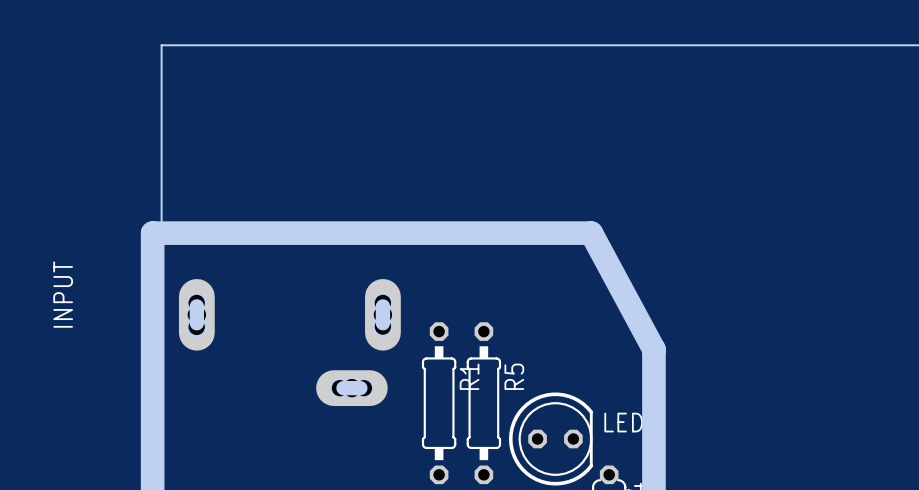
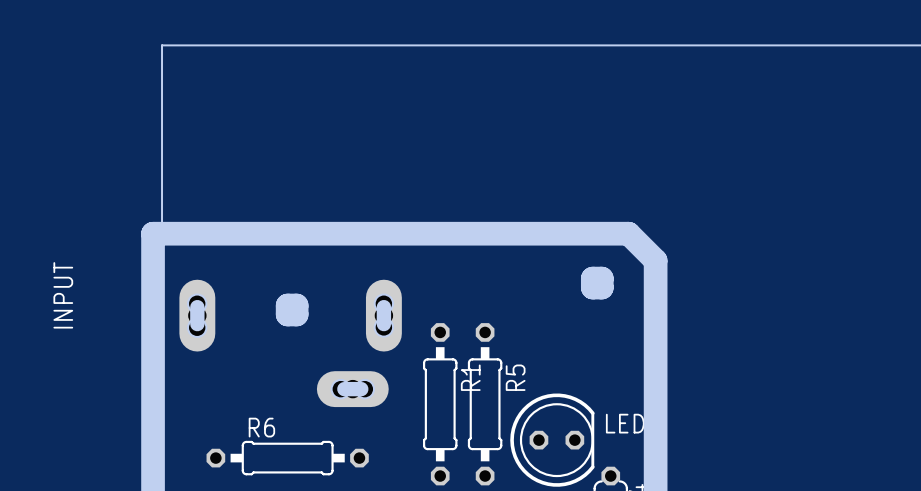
board edge: (591, 233) (653, 349) -> (592, 233) (628, 233) (655, 260) (655, 350)
board edge: none -> (592, 278) (601, 278) (601, 287) (592, 287) (592, 278)
board edge: none -> (287, 305) (296, 305) (296, 314) (287, 314) (287, 305)
R6: none -> (287, 458)

